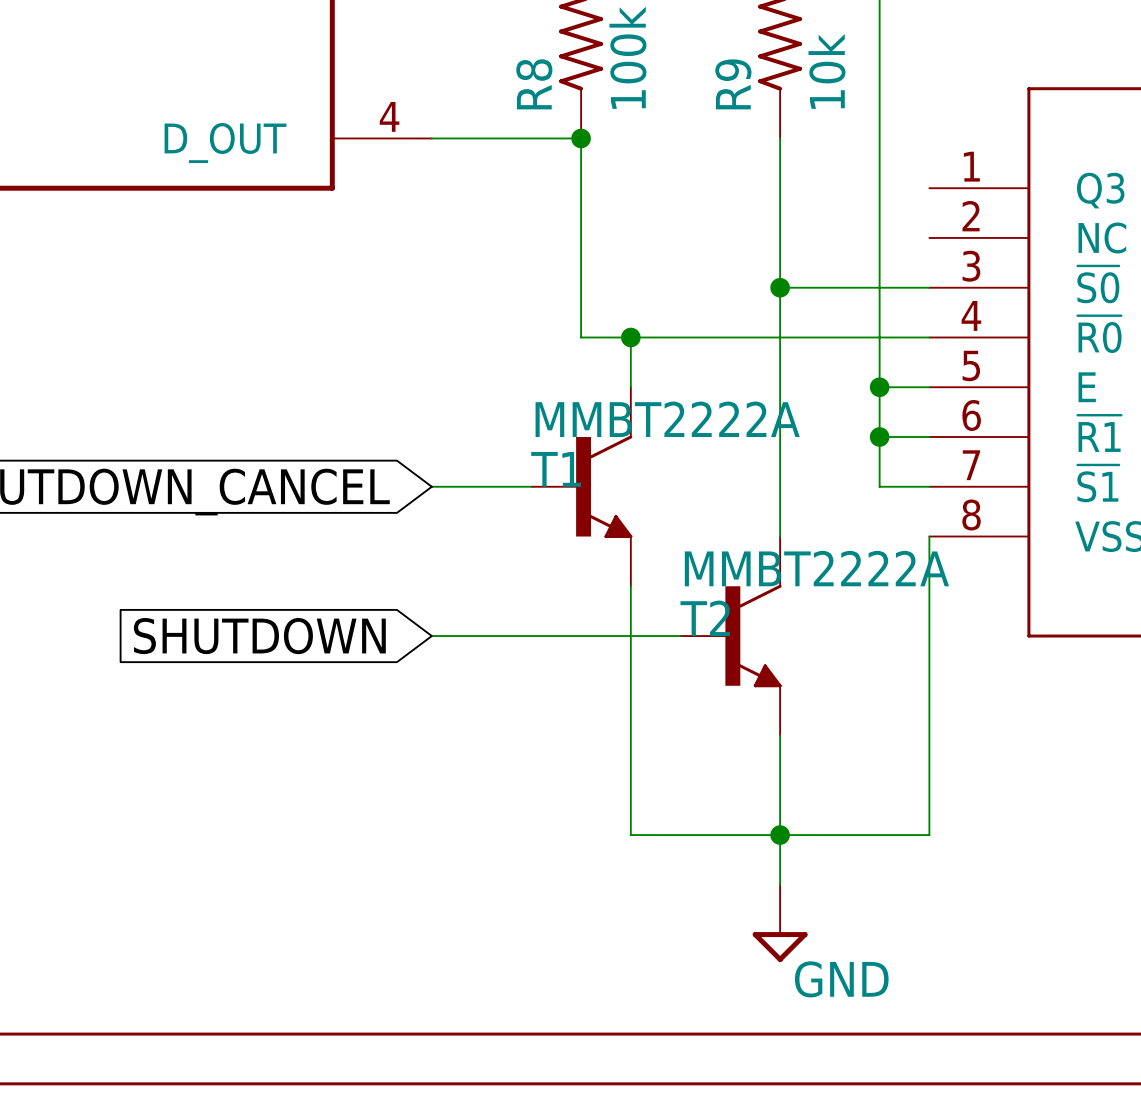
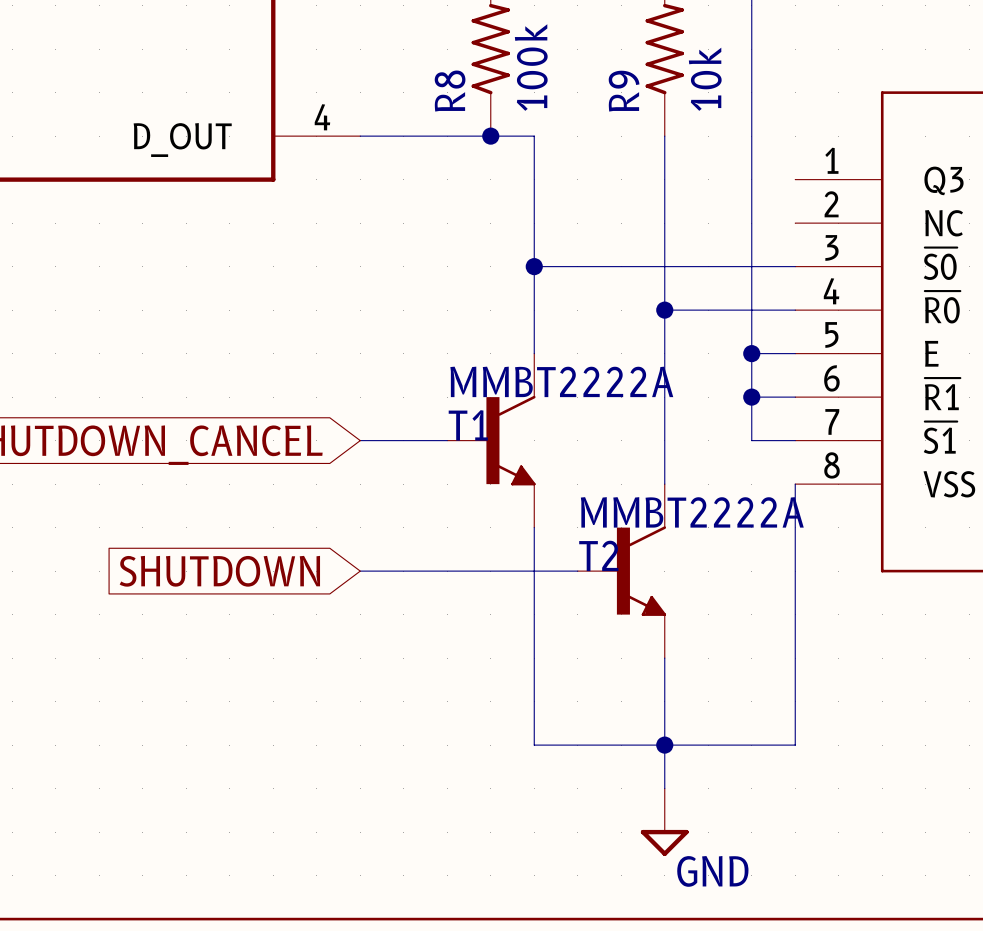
wire: (581, 138) (581, 337) (780, 337) -> (490, 136) (534, 136) (534, 310)
wire: none -> (534, 266) (664, 266)
junction position: (780, 287) -> (664, 310)
junction position: (630, 337) -> (534, 266)

